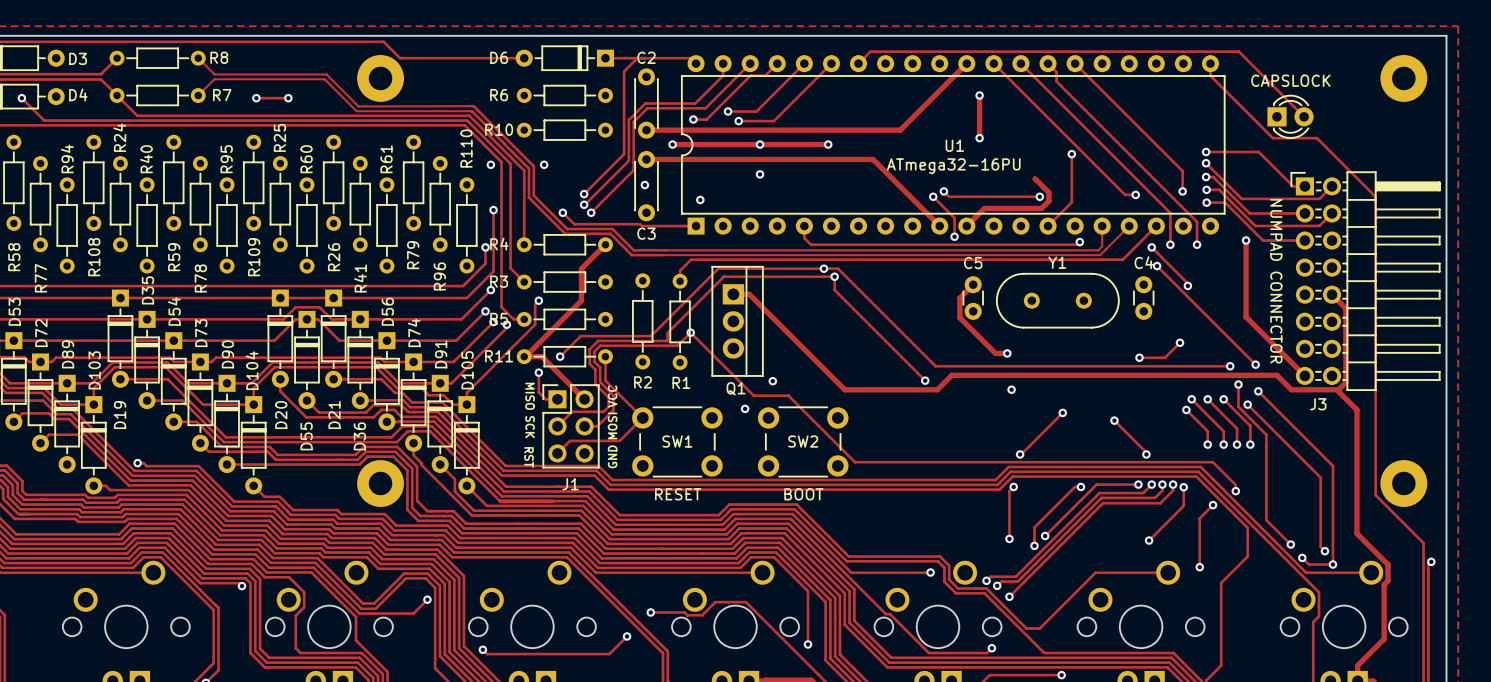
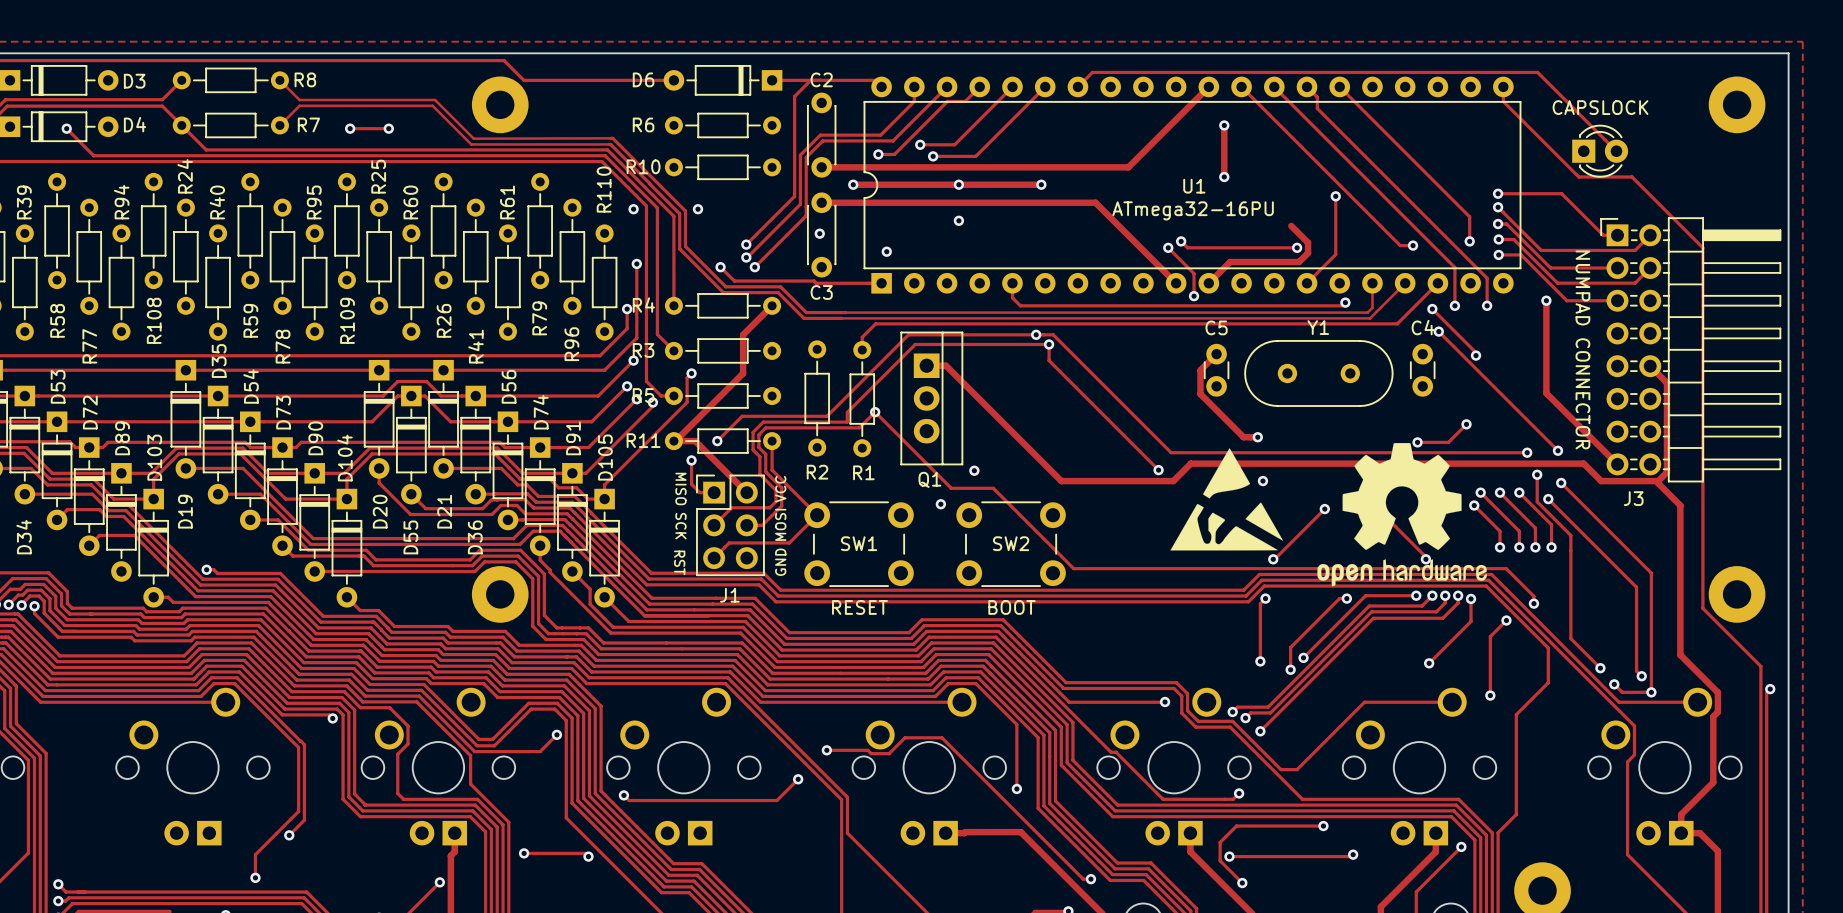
drawing: none -> [1317, 443, 1487, 587]
drawing: none -> [1170, 448, 1284, 551]

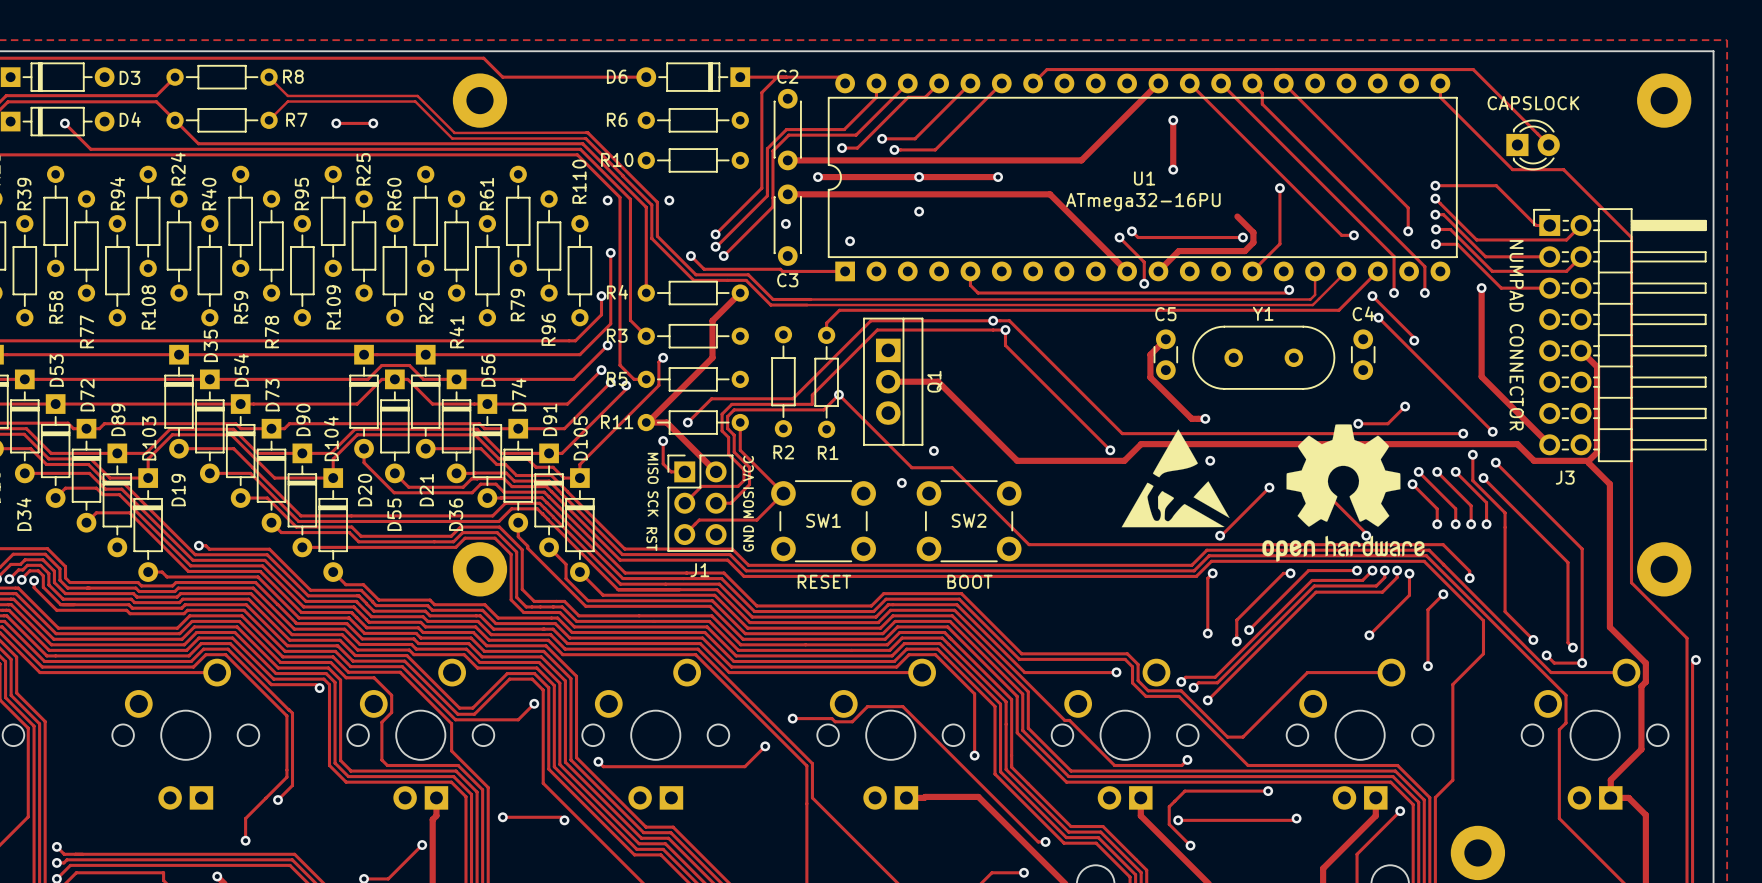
track: (926, 365) (946, 365) (978, 398) -> (888, 381) (938, 381)
Q1 name rotation: 0° (929, 479) -> 90° counterclockwise (934, 381)
Q1 name position: Q1 (929, 479) -> Q1 (934, 381)

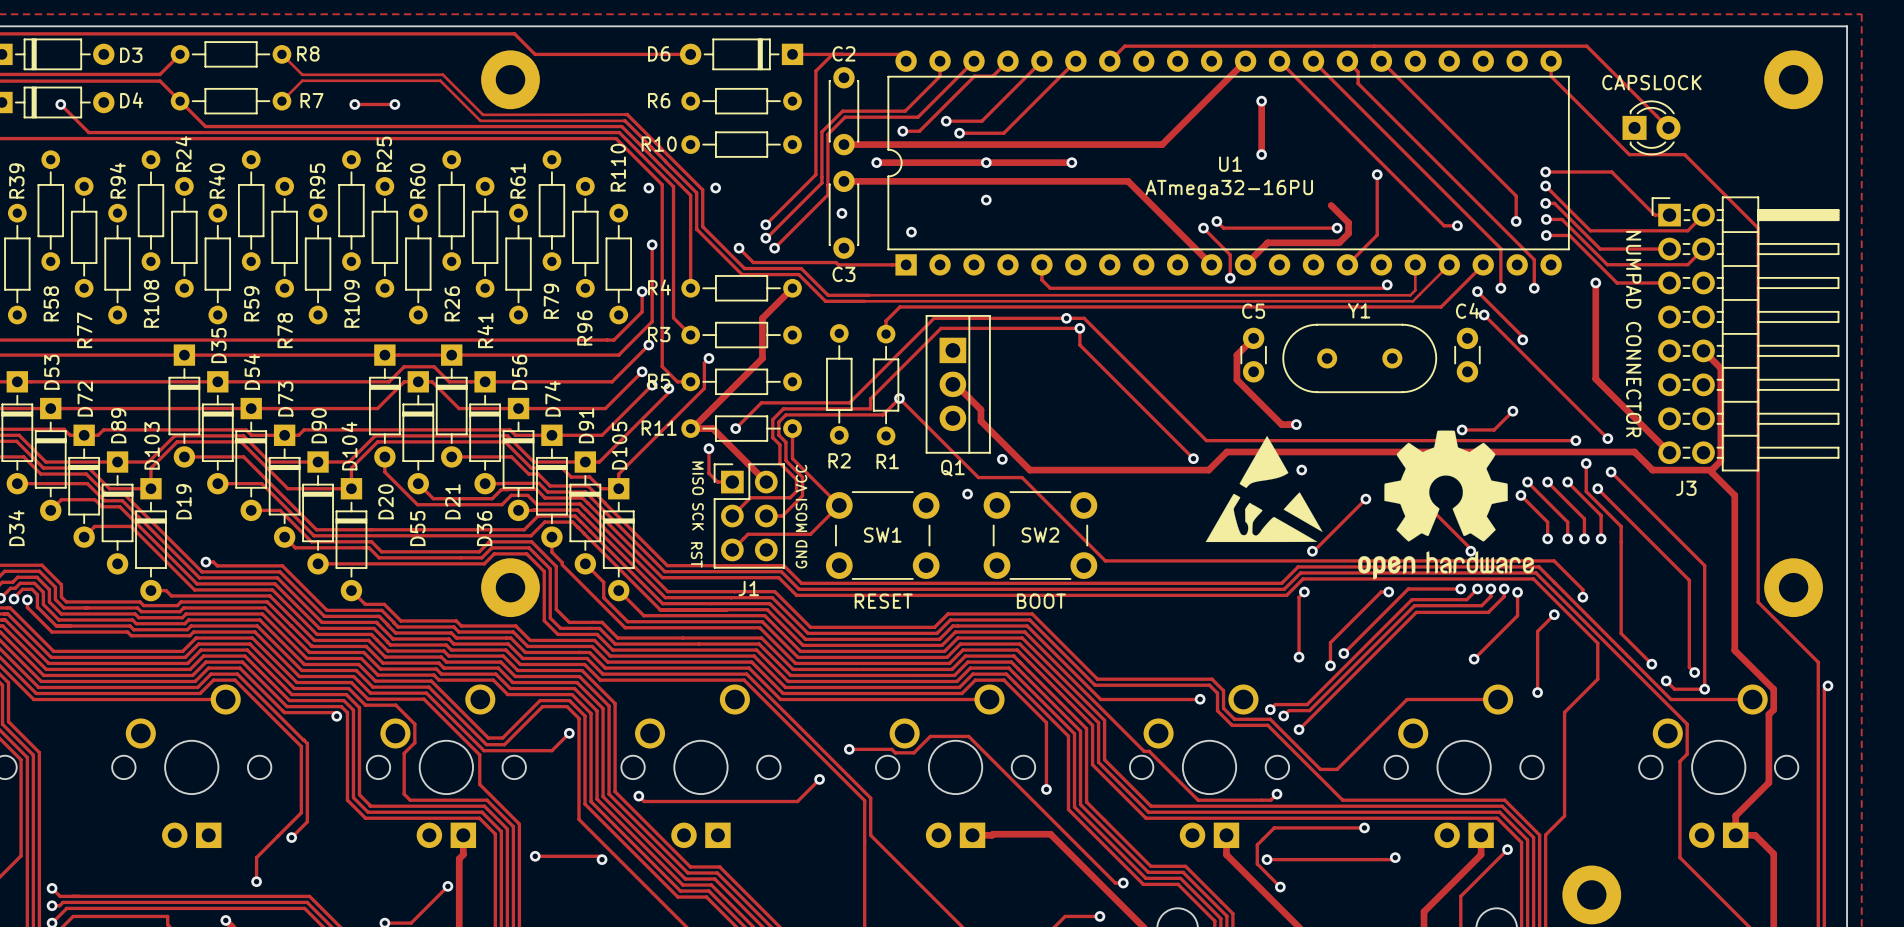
track: (888, 381) (938, 381) (1017, 460) -> (954, 383) (980, 409) (980, 421) (1029, 470) (1092, 470)
Q1 name rotation: 0° (934, 381) -> 90° clockwise (952, 468)
Q1 name position: Q1 (934, 381) -> Q1 (952, 468)

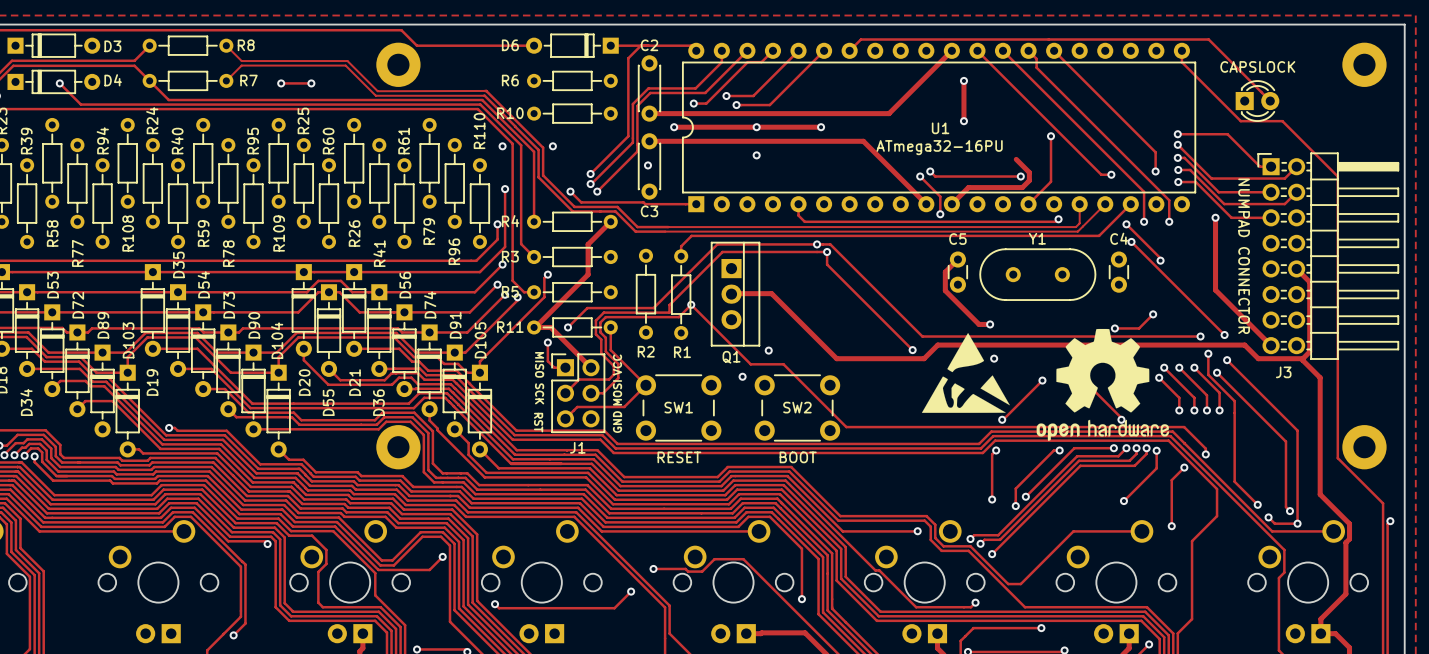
via: (911, 232) -> none
track: (954, 383) (980, 409) (980, 421) (1029, 470) (1092, 470) -> (732, 293) (771, 293) (836, 358)

